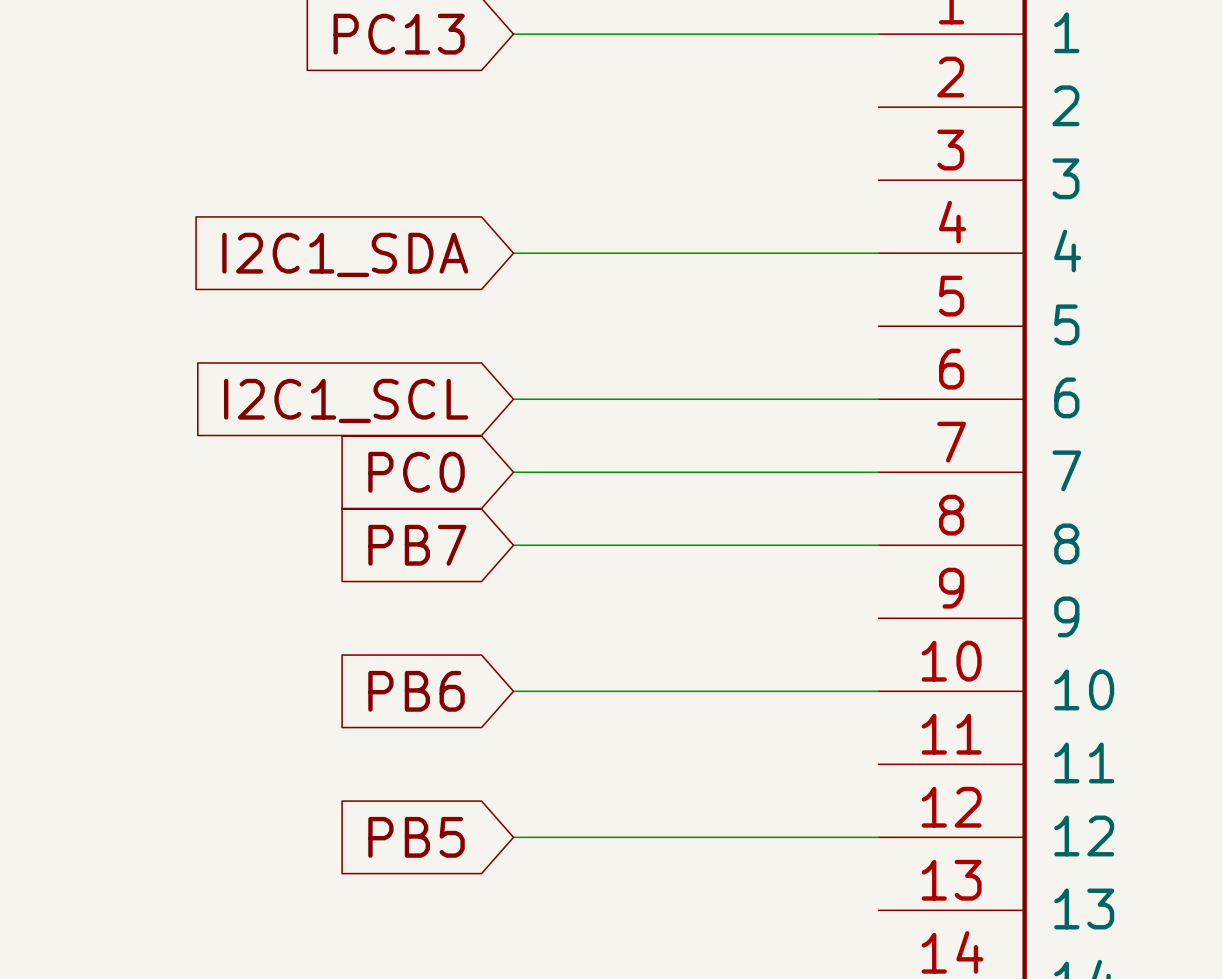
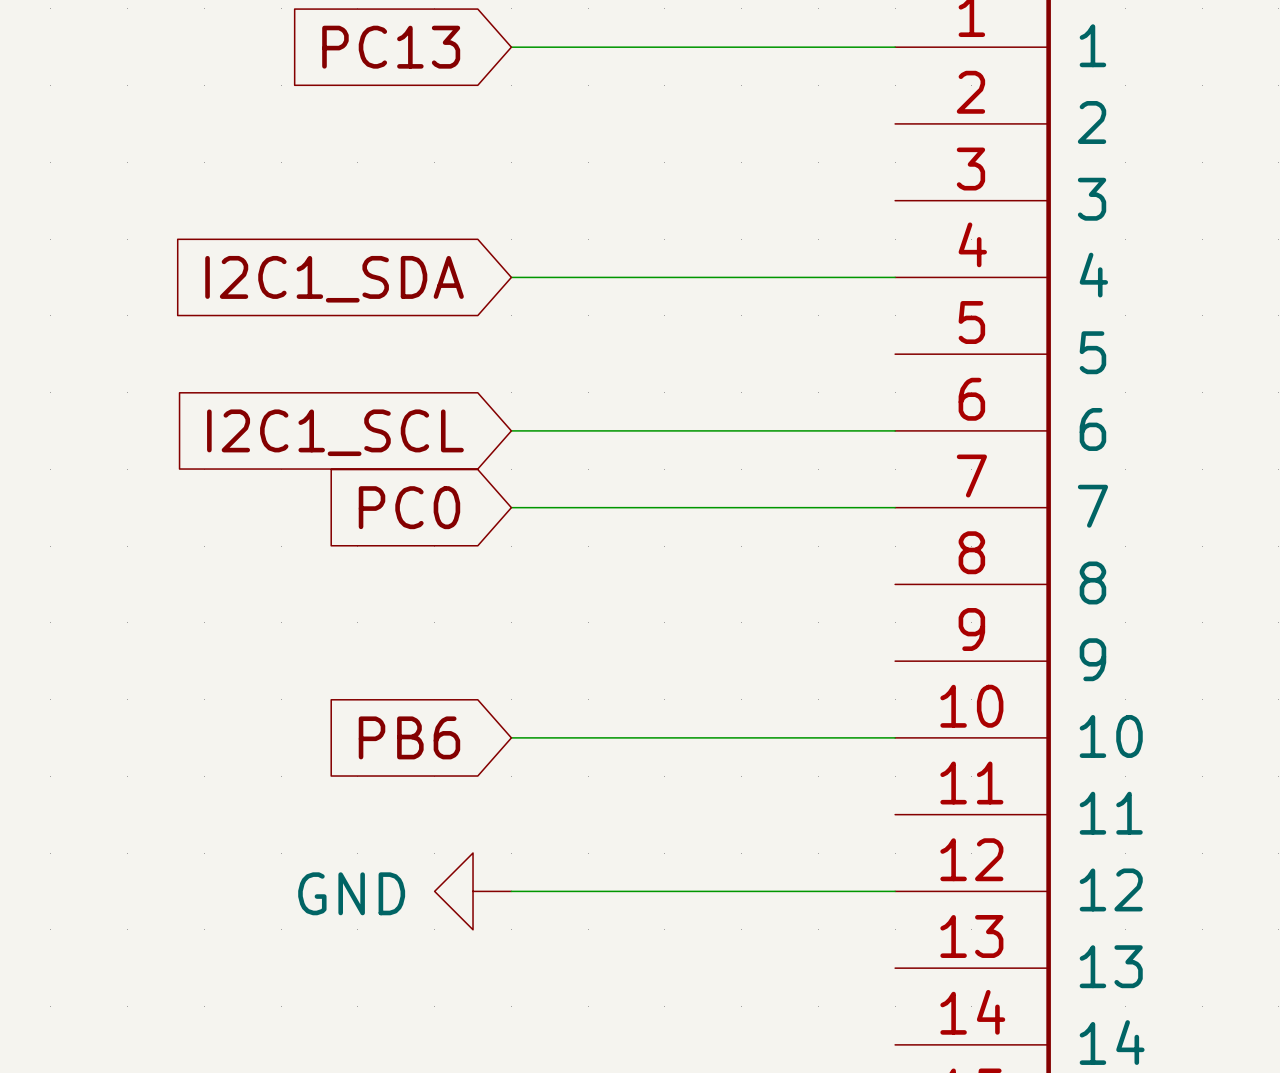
global label: PB7 (417, 545) -> none
wire: (513, 545) (878, 545) -> none
global label: PB5 (416, 837) -> none
power symbol: none -> GND (473, 891)

